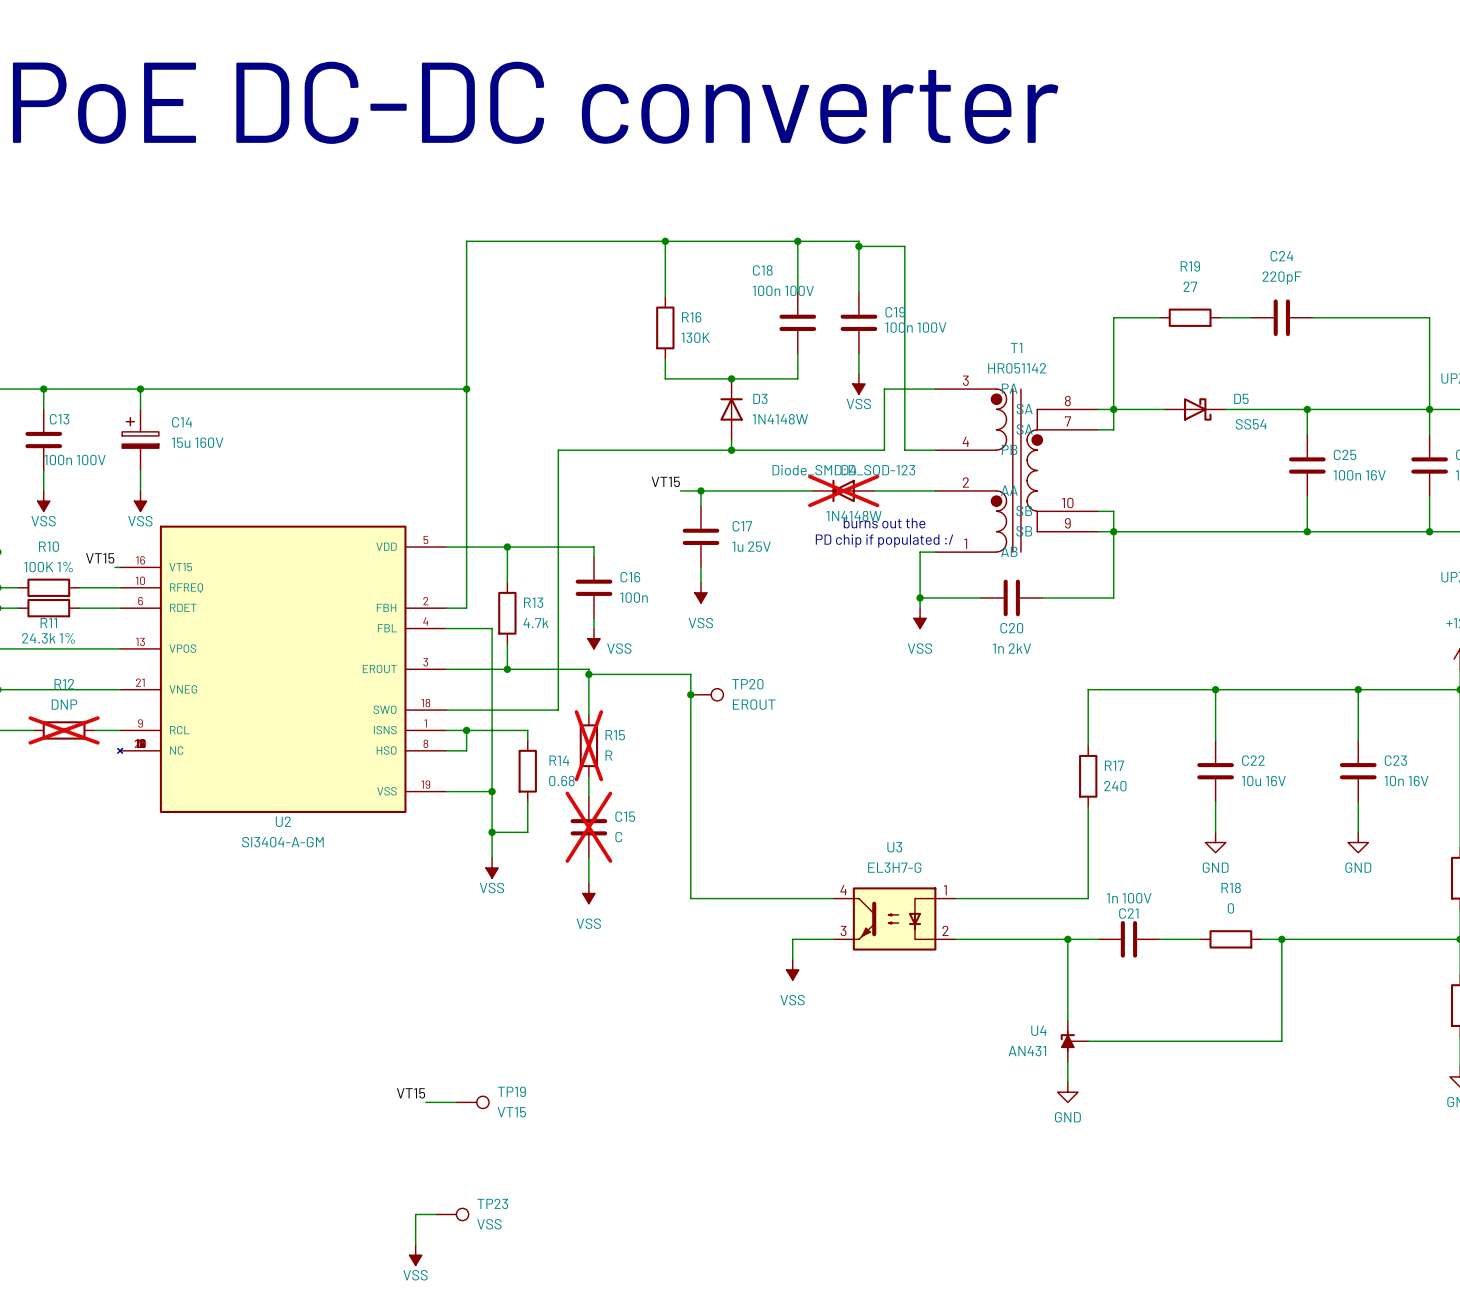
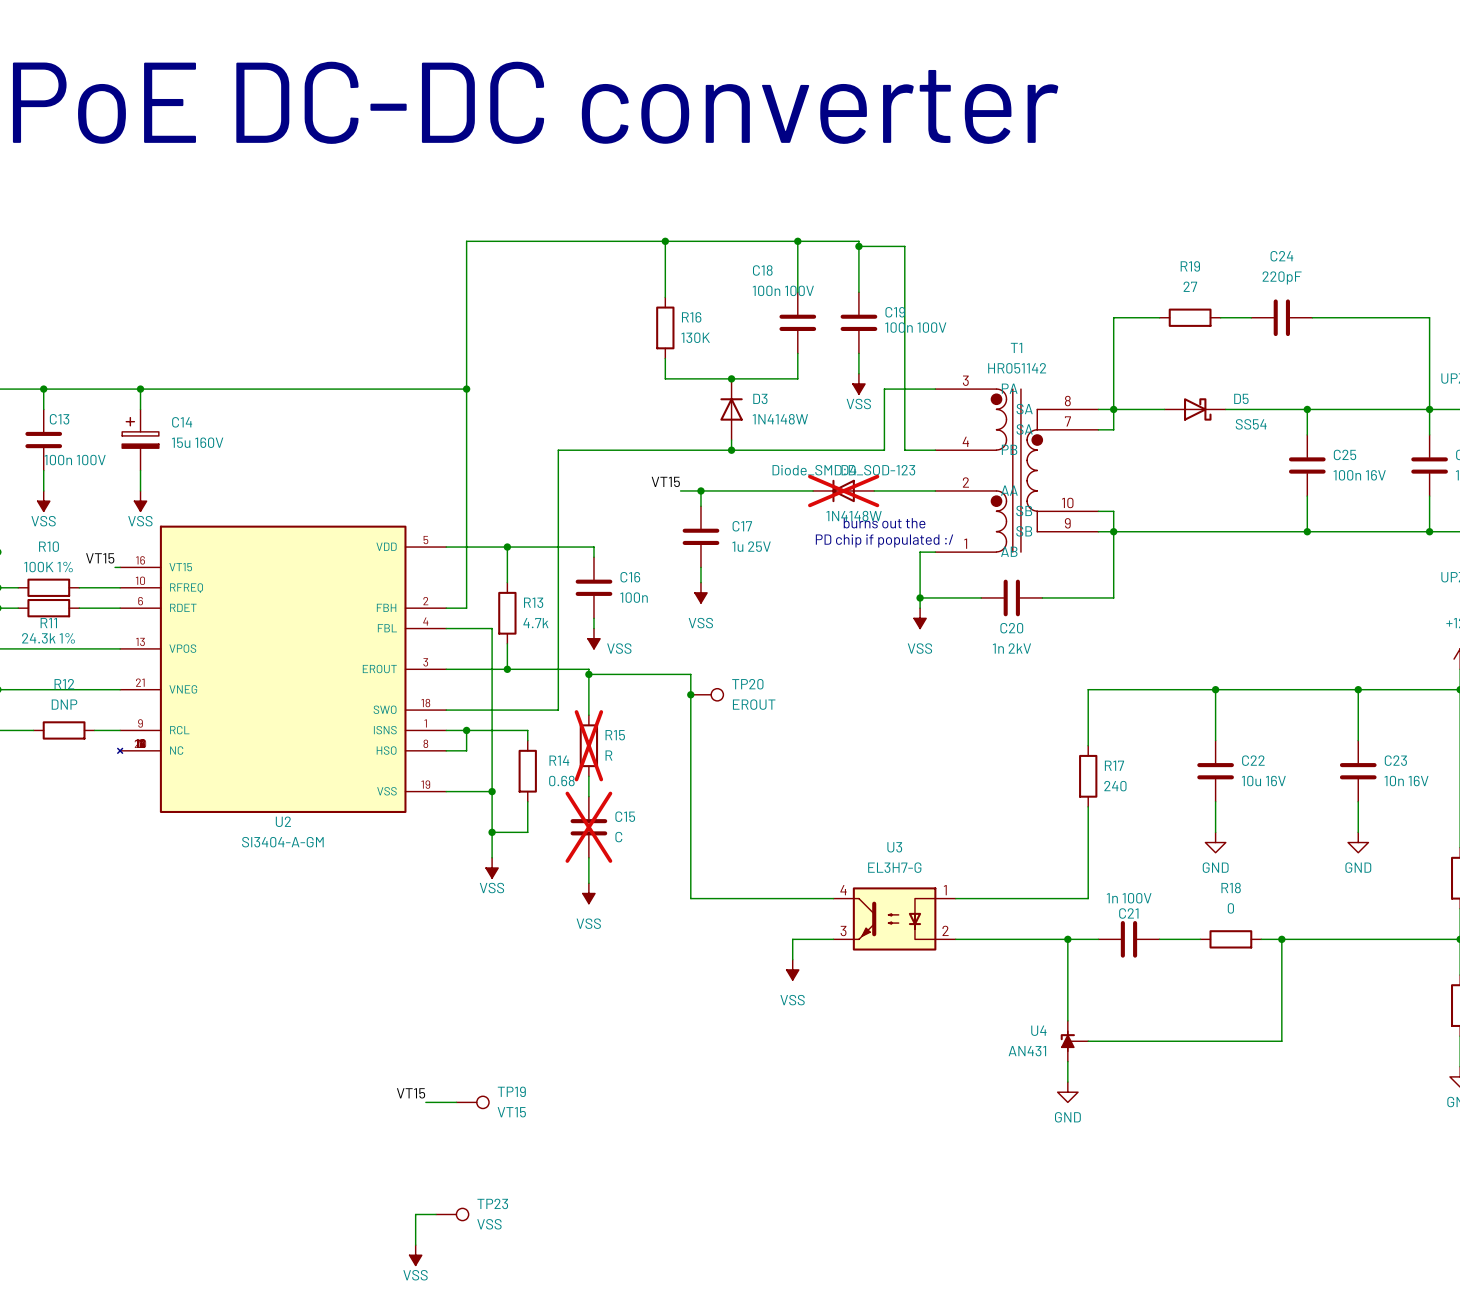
R12 do-not-place cross: (64, 730) -> none

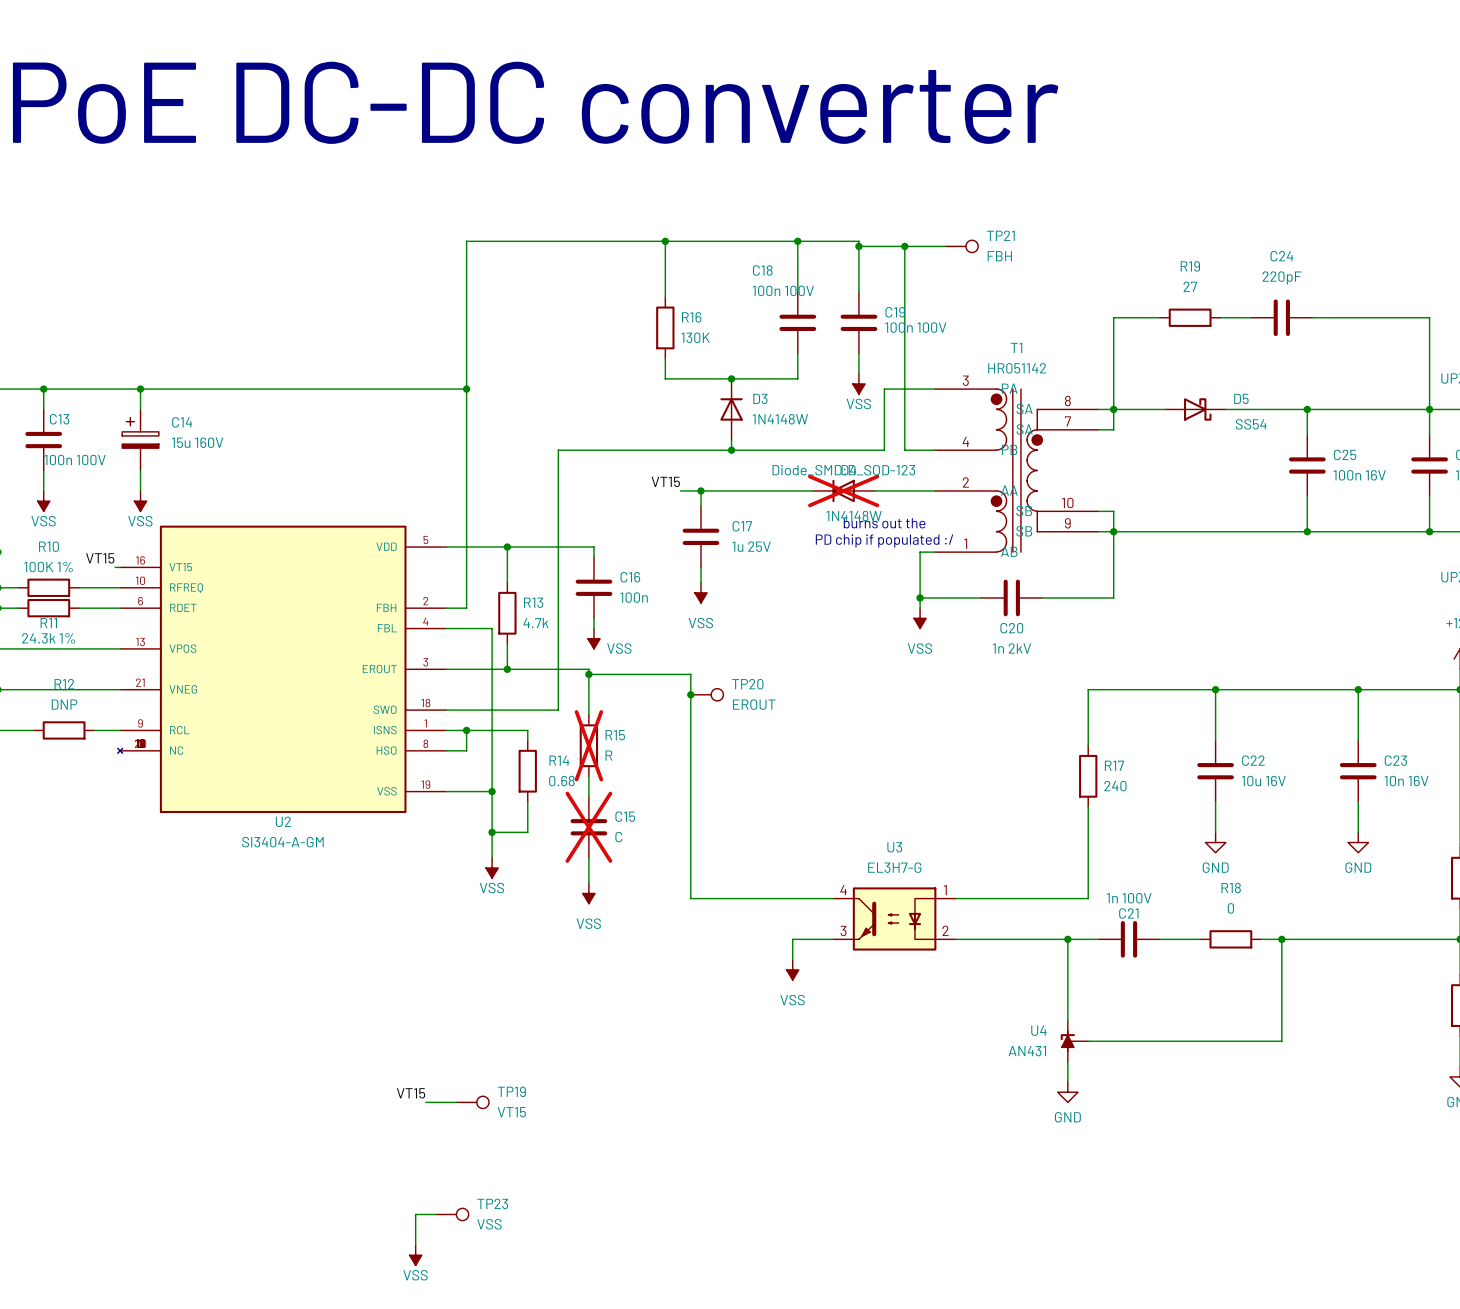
wire: none -> (904, 246) (945, 246)
junction: none -> (904, 246)
TP21: none -> FBH (961, 246)

